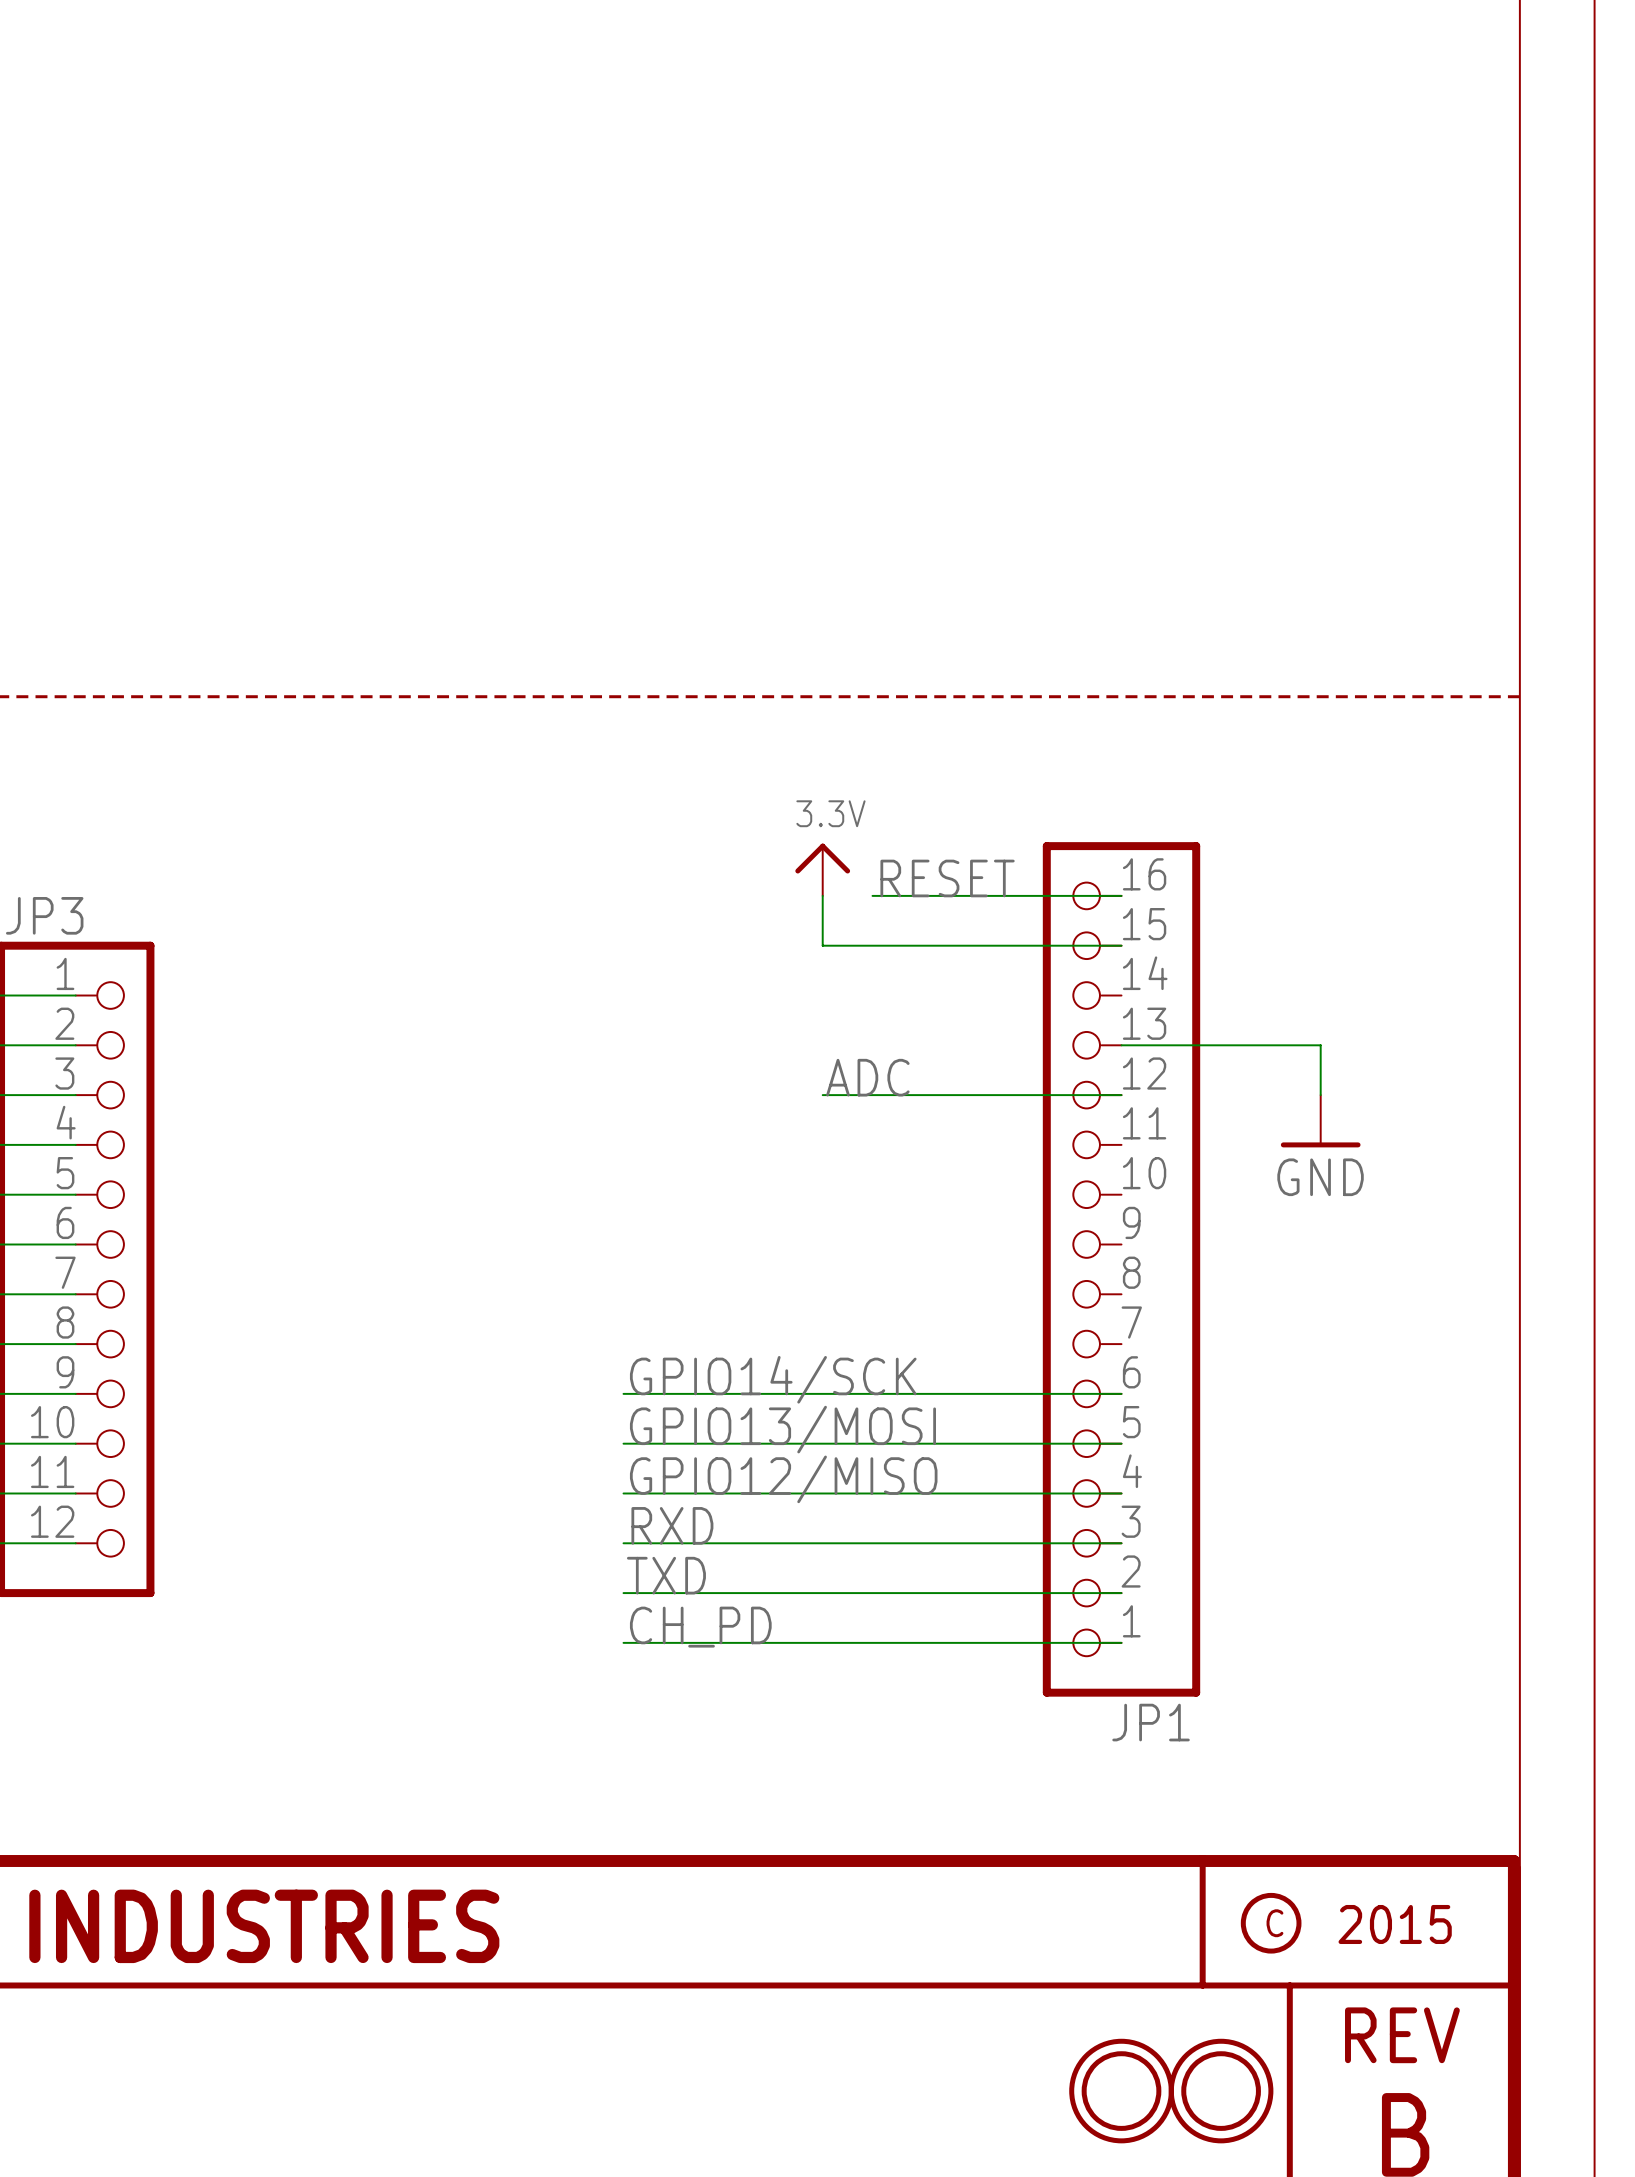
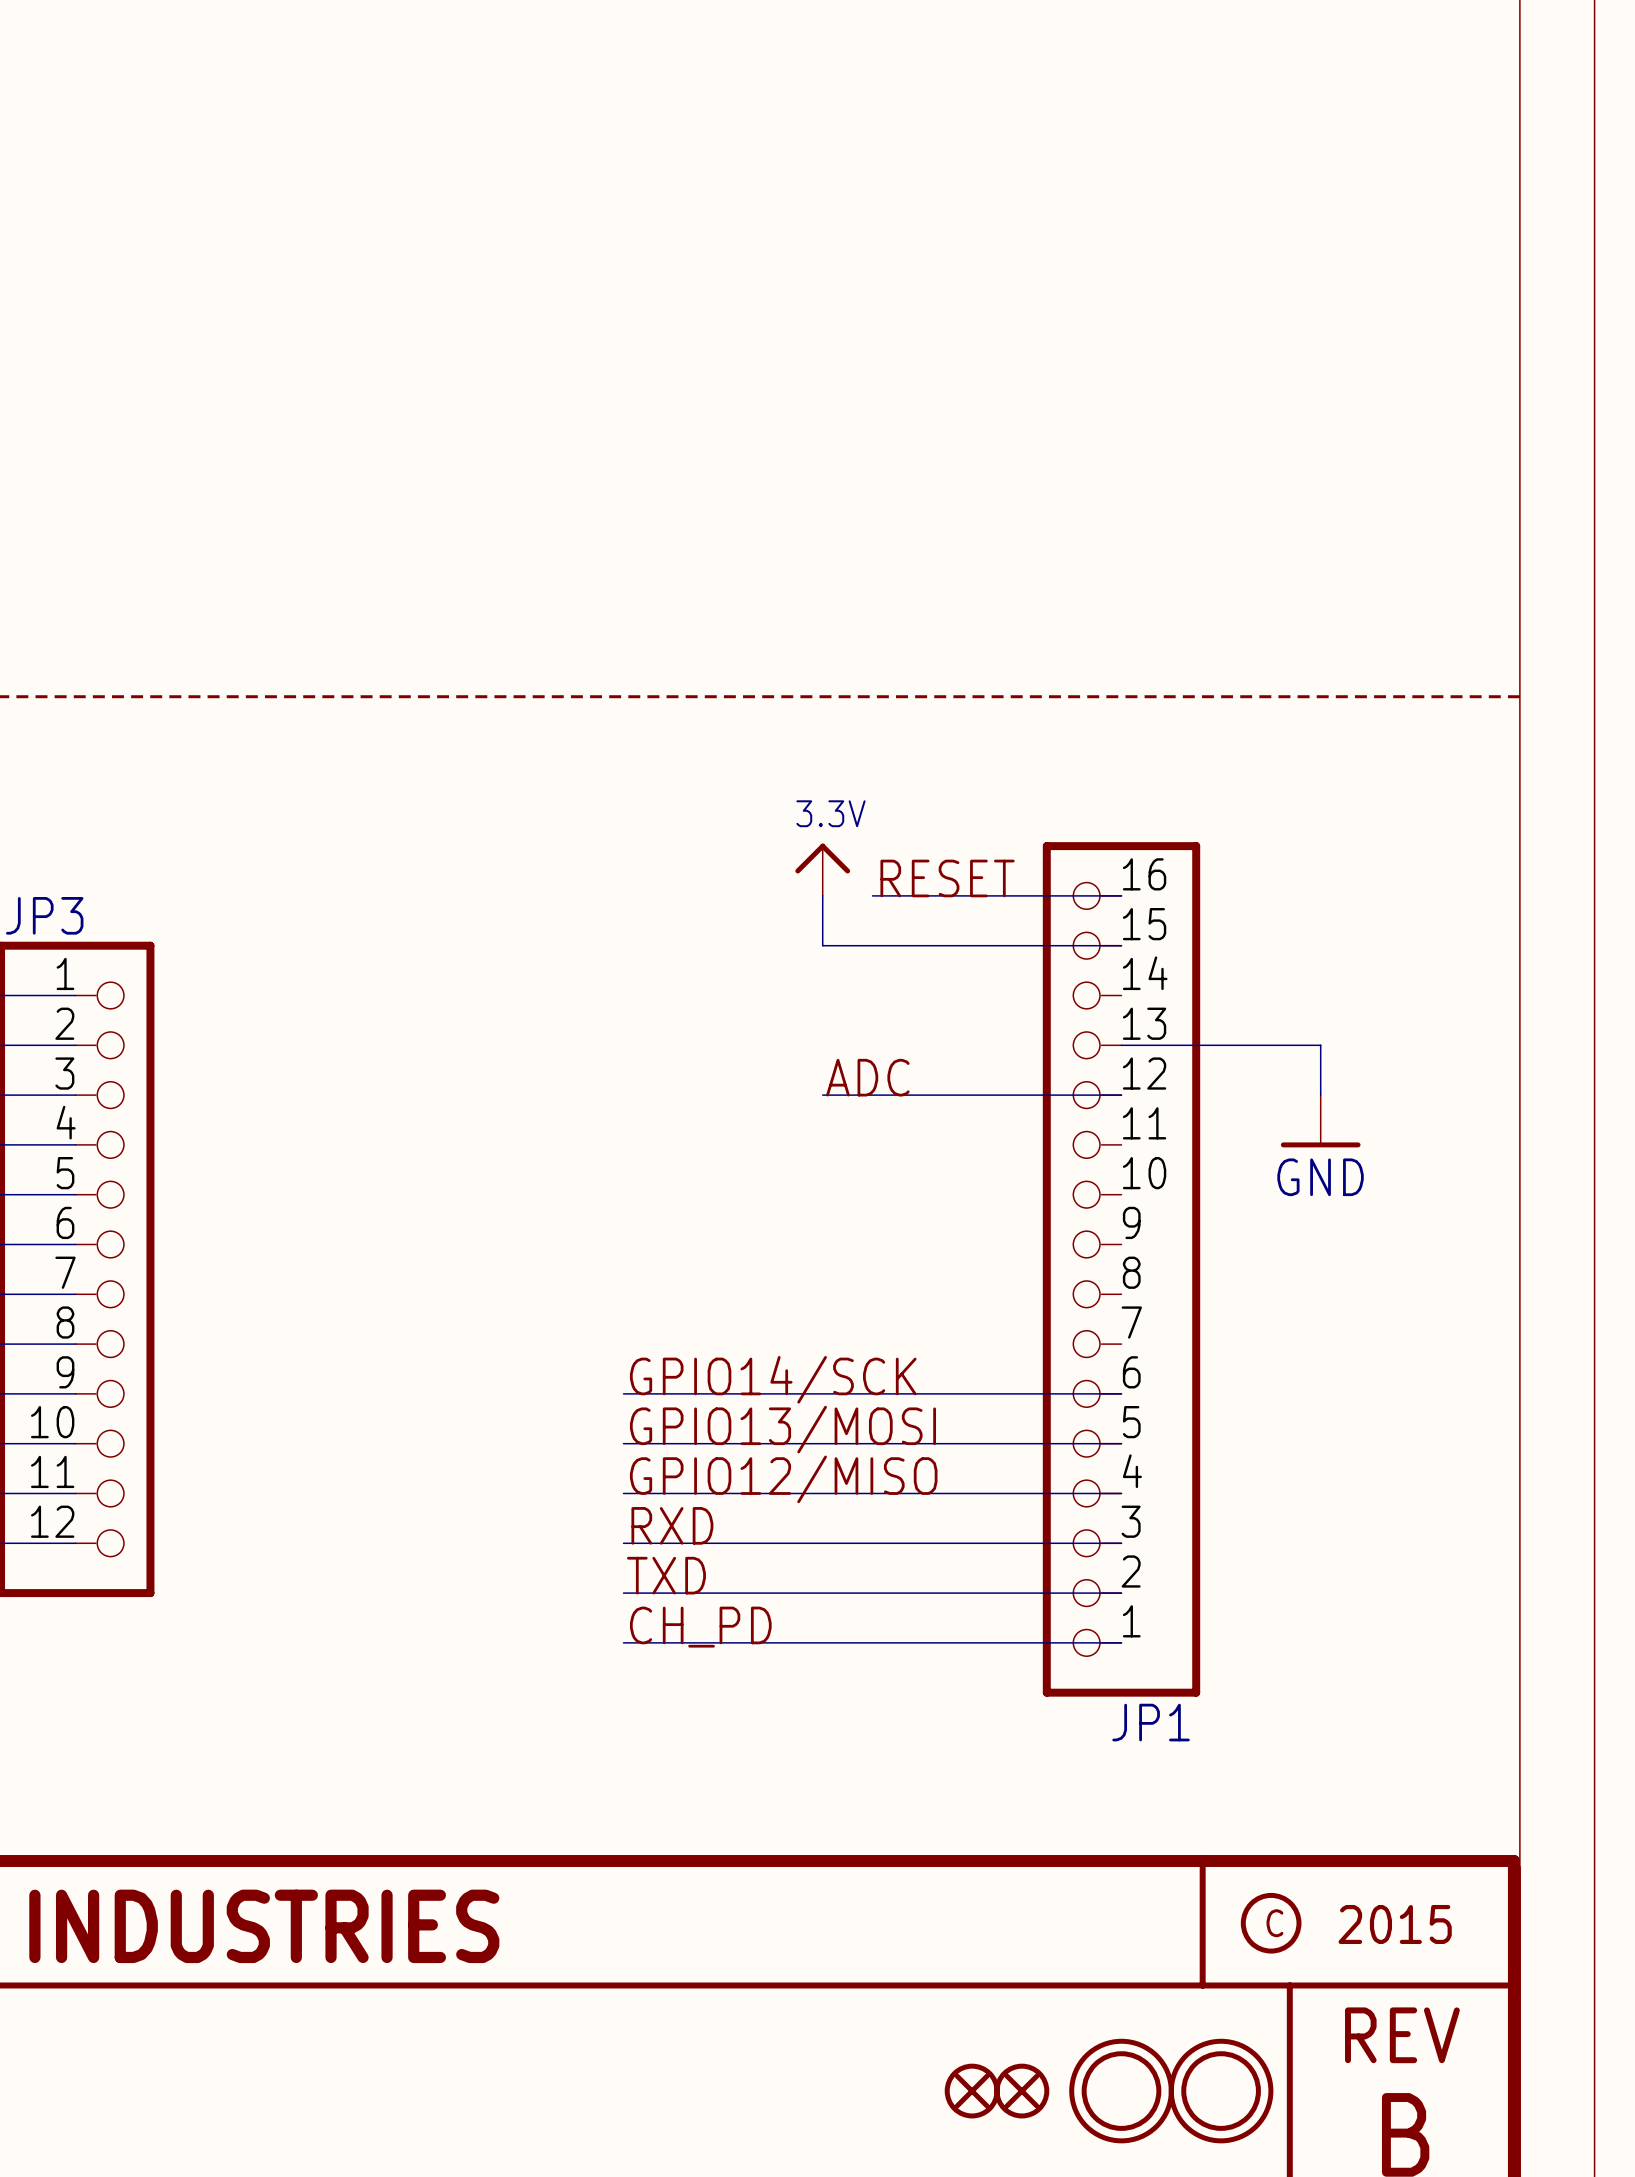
part: none -> (972, 2091)
part: none -> (1021, 2091)

